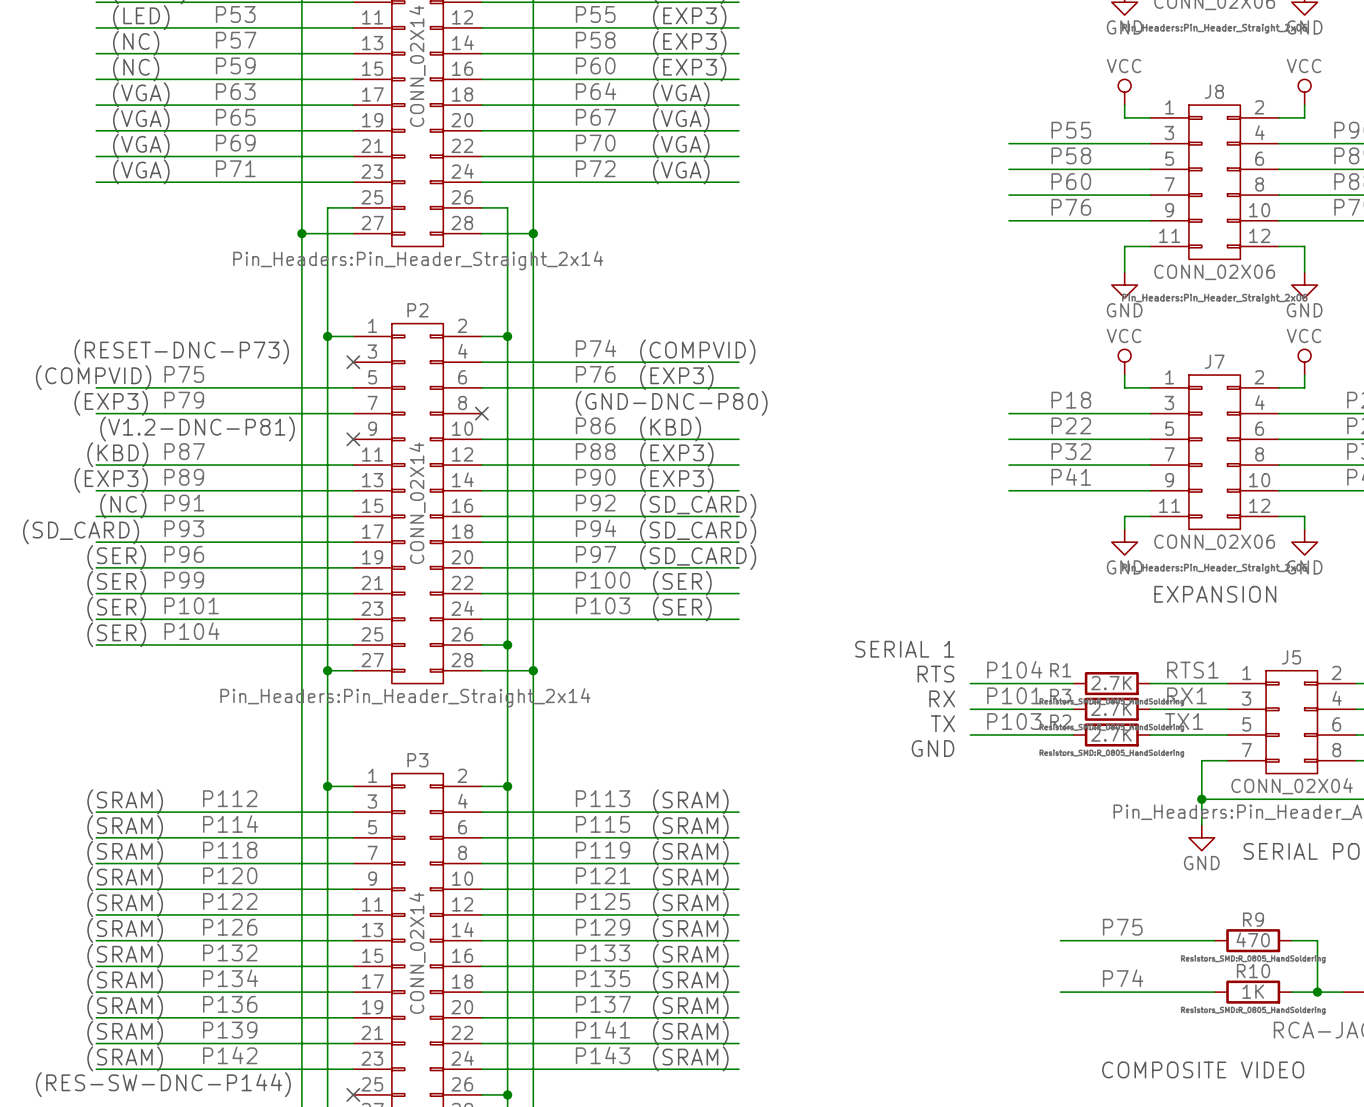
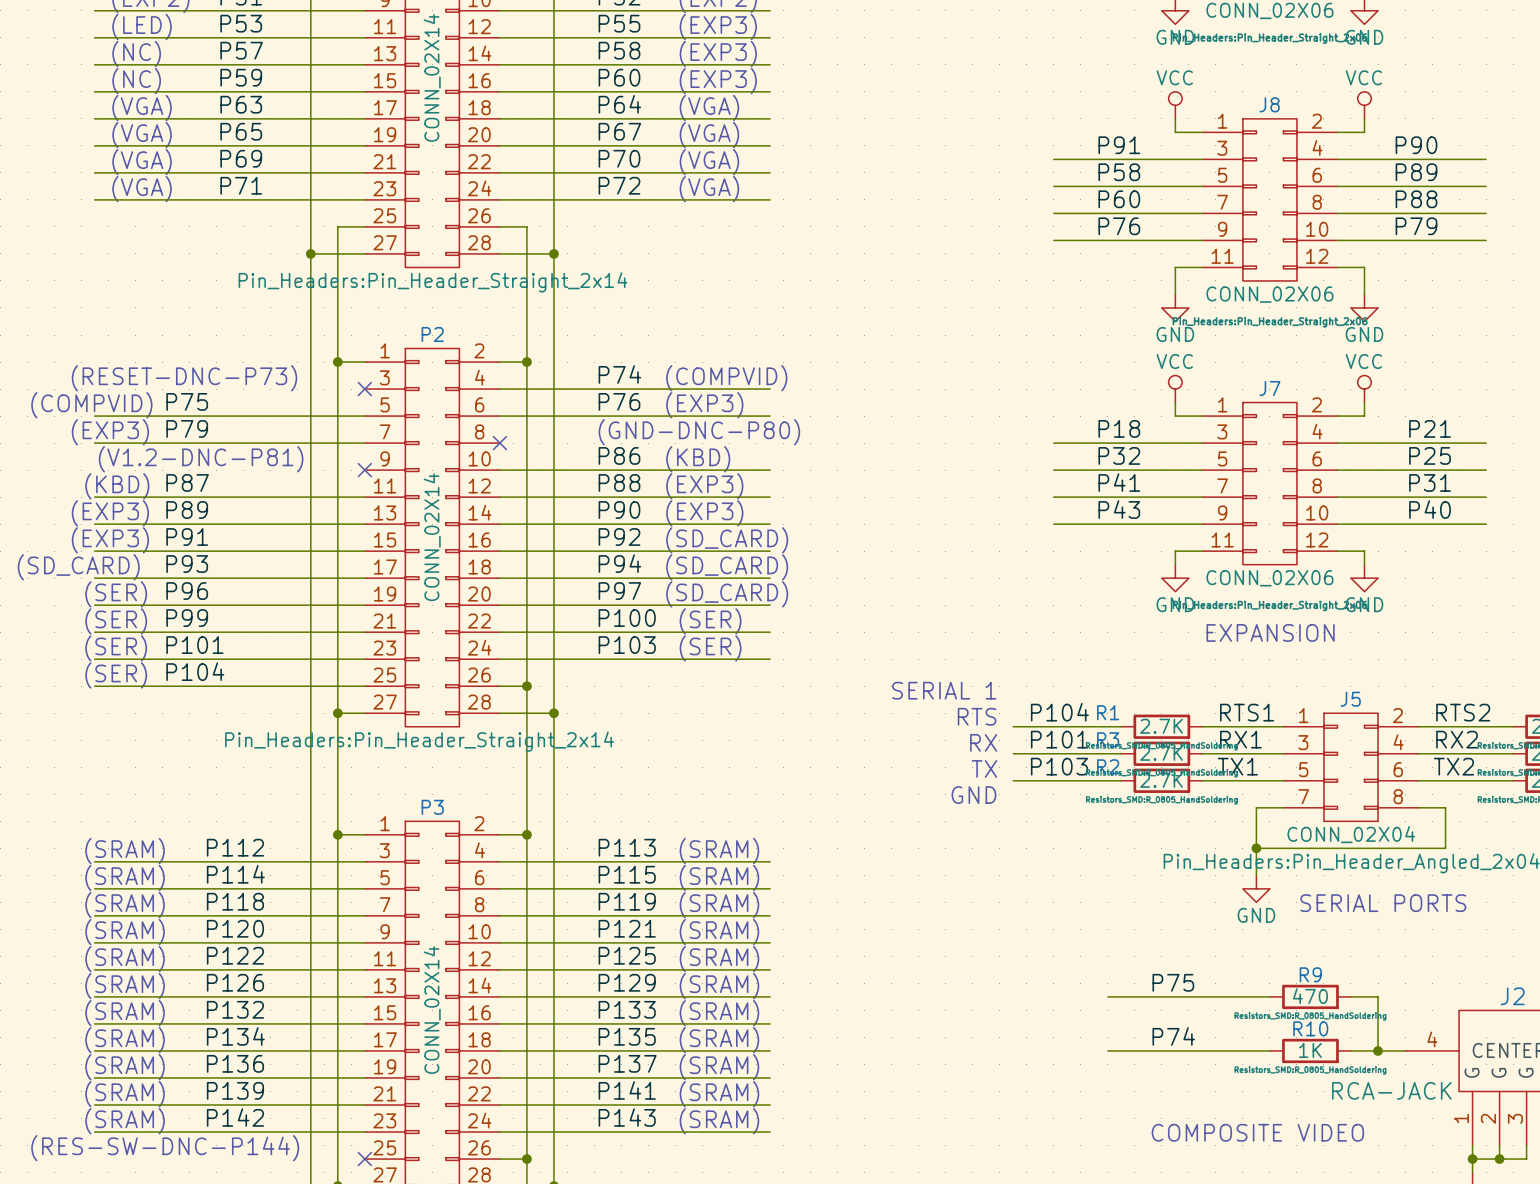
label: P55 (1071, 130) -> P91 (1119, 145)
label: P22 (1071, 425) -> P32 (1119, 455)
label: P32 (1071, 451) -> P41 (1119, 482)
label: P41 (1071, 476) -> P43 (1119, 509)
text: none -> (EXP3) (110, 540)
text: (NC) (123, 506) -> none

